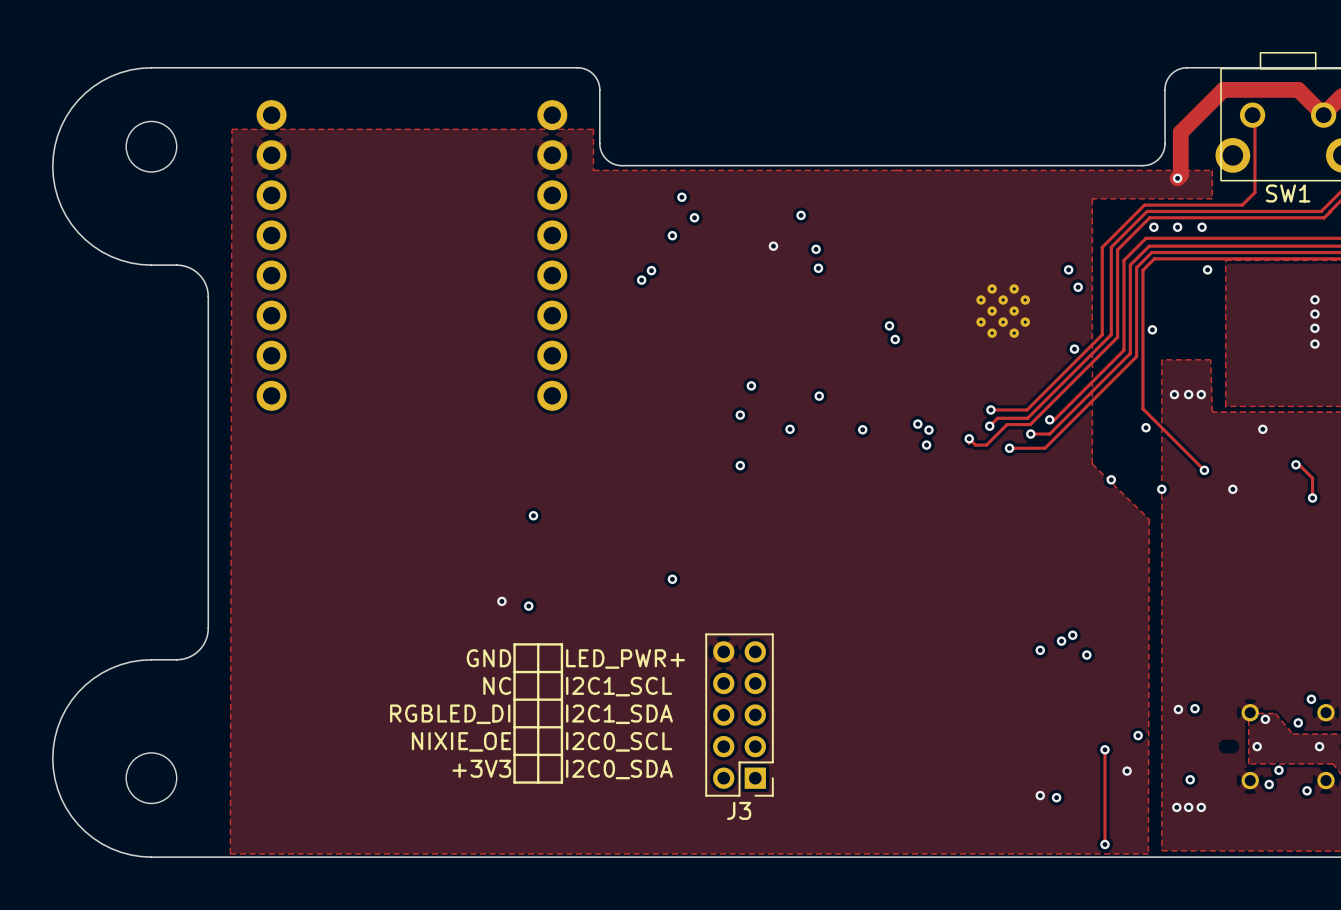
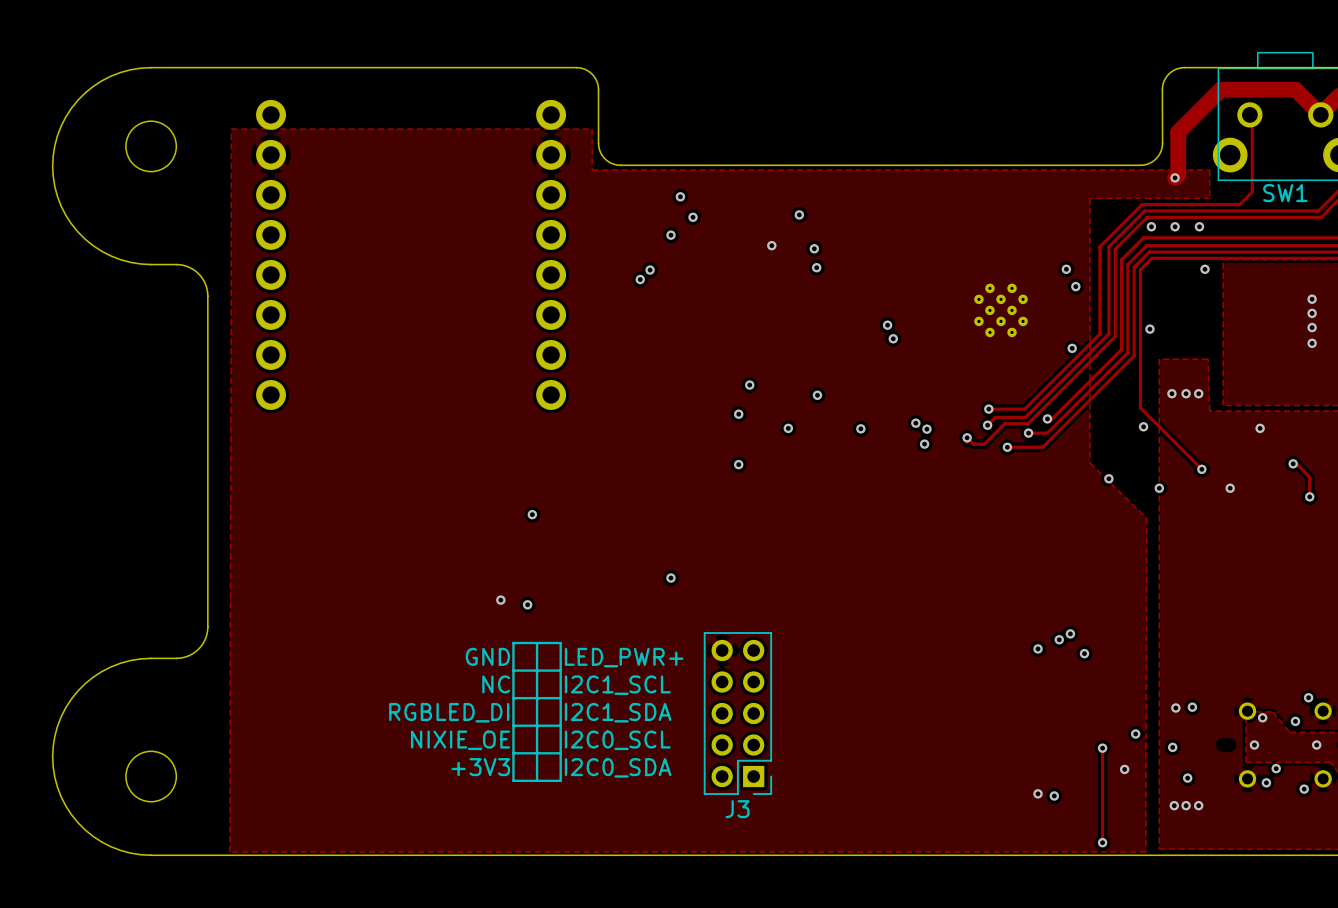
via: none -> (1172, 747)

